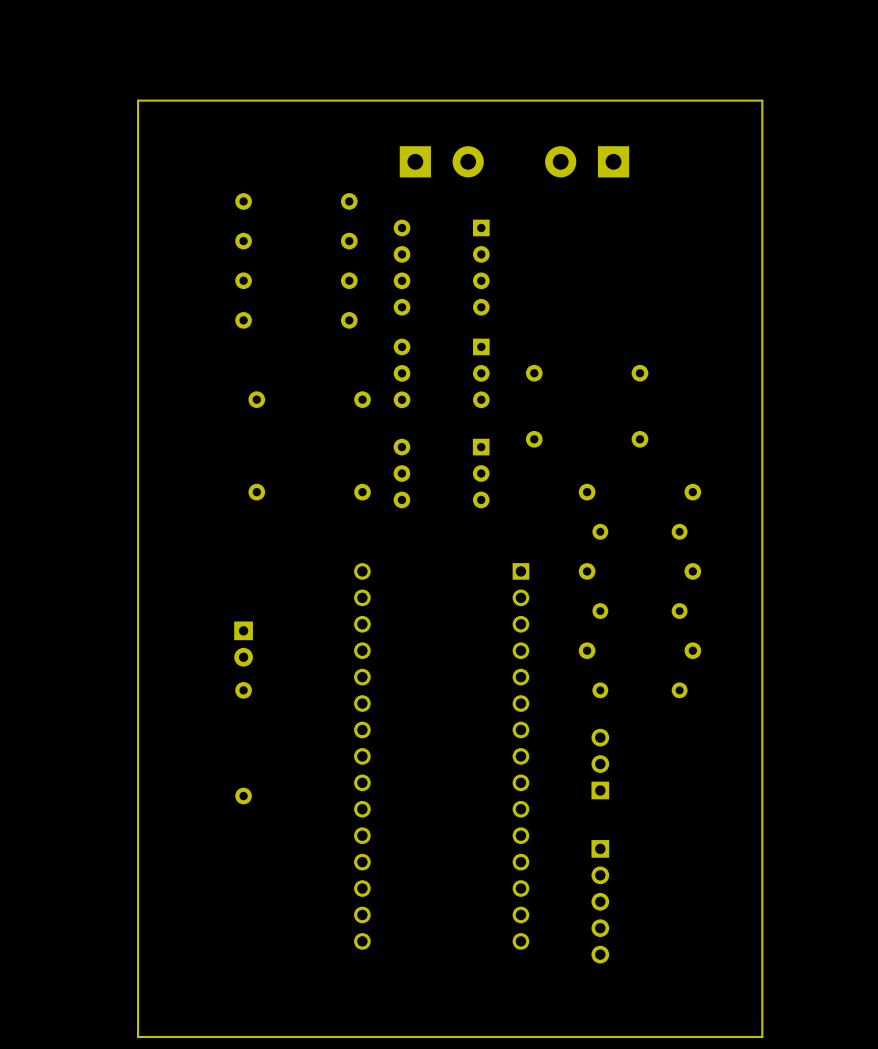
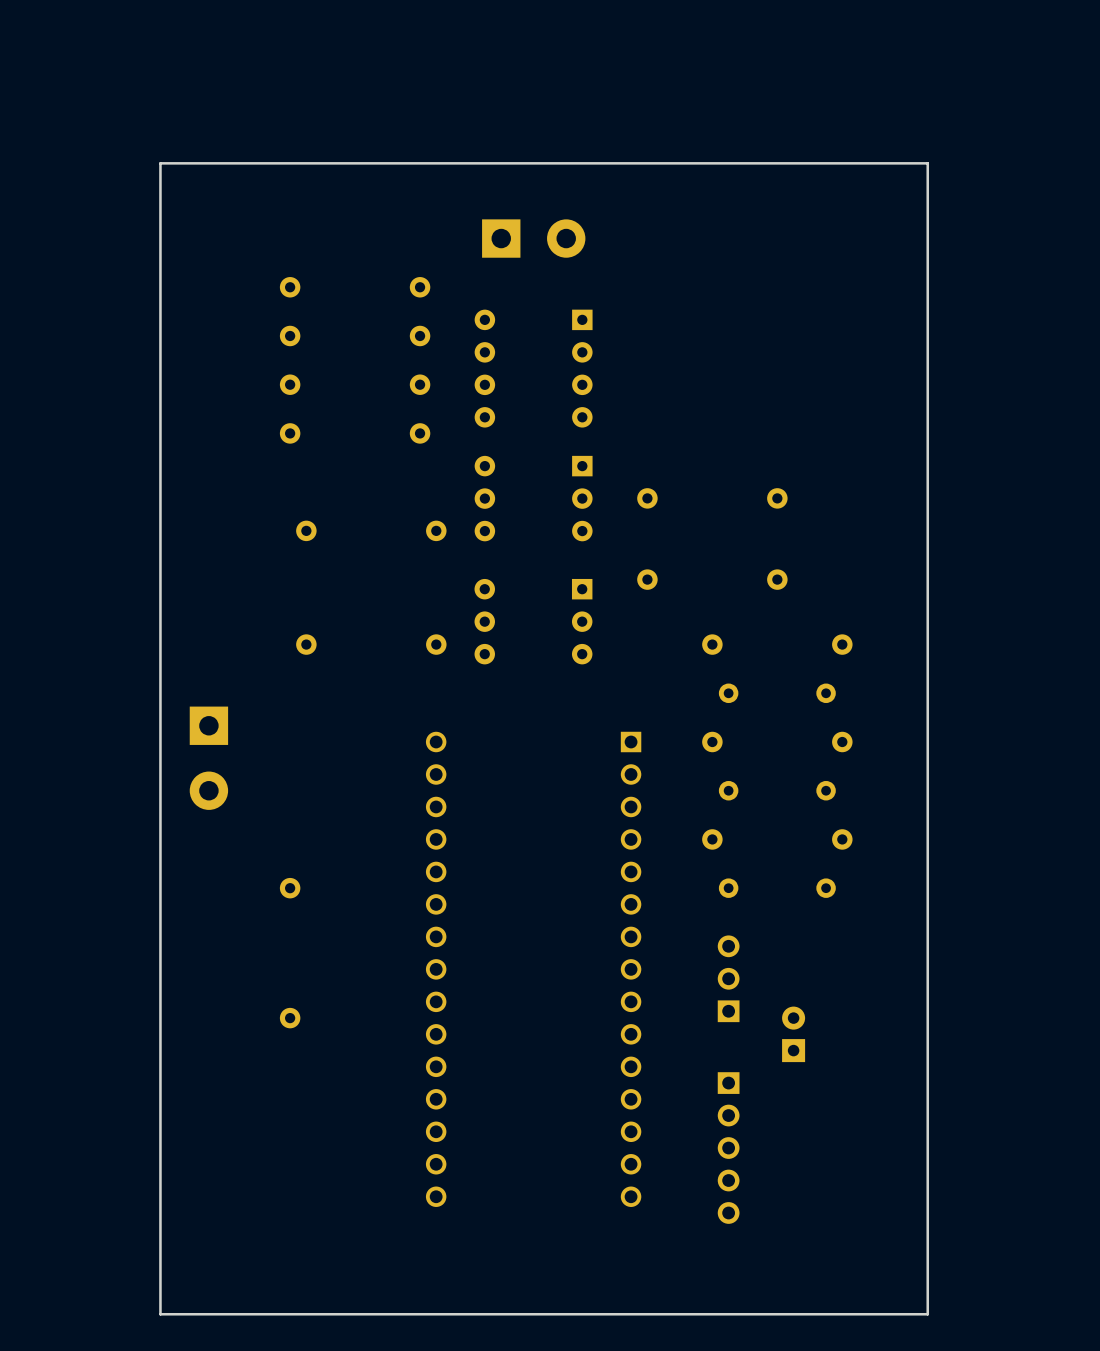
part: (587, 161) -> none
part: none -> (208, 758)
part: (243, 644) -> none
part: none -> (793, 1034)

